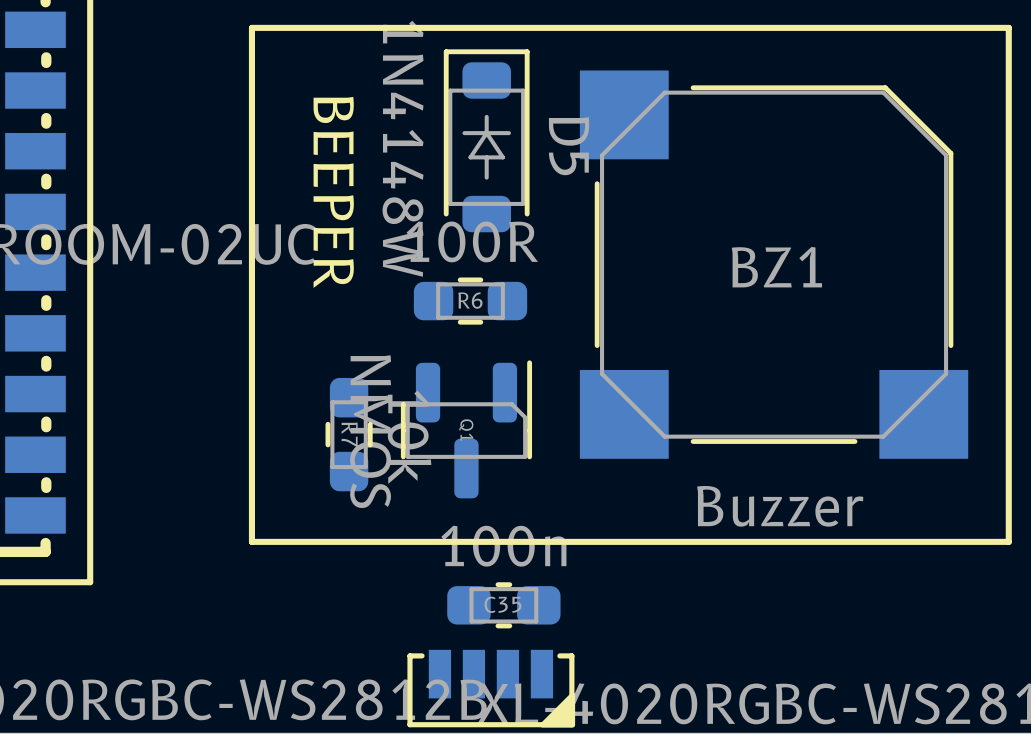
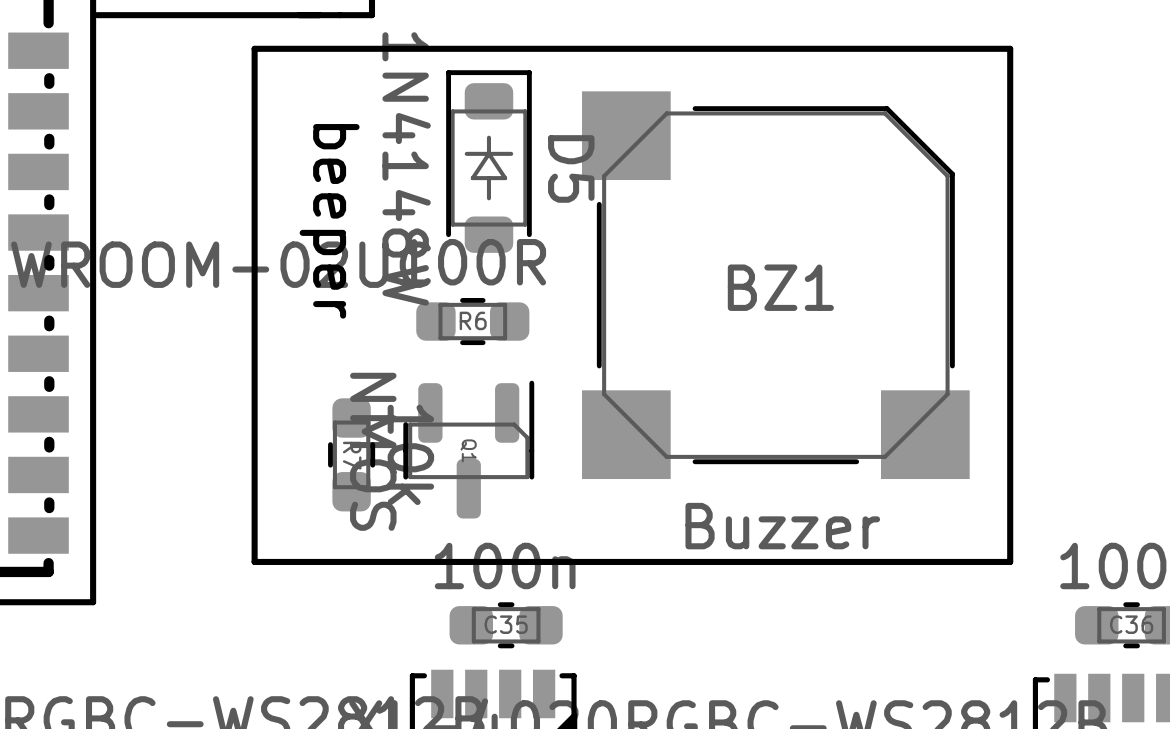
text: BEEPER (333, 192) -> beeper (329, 221)

